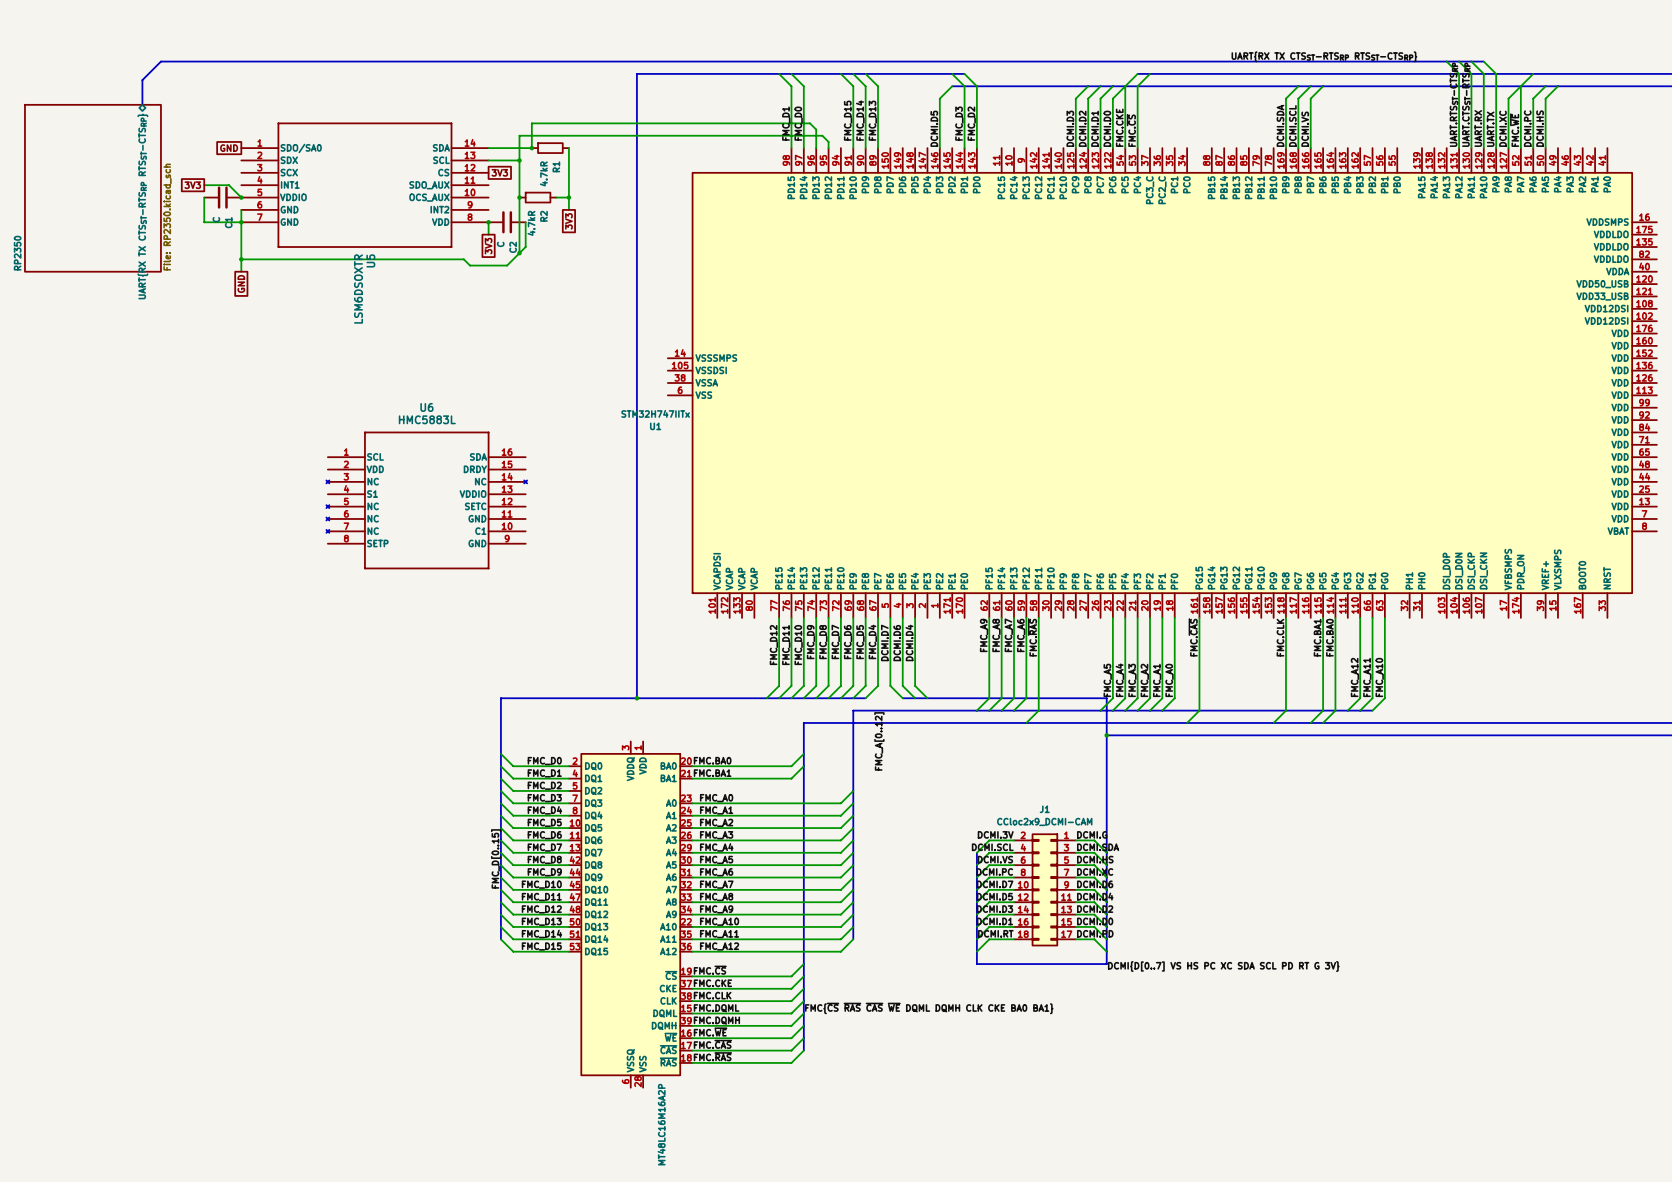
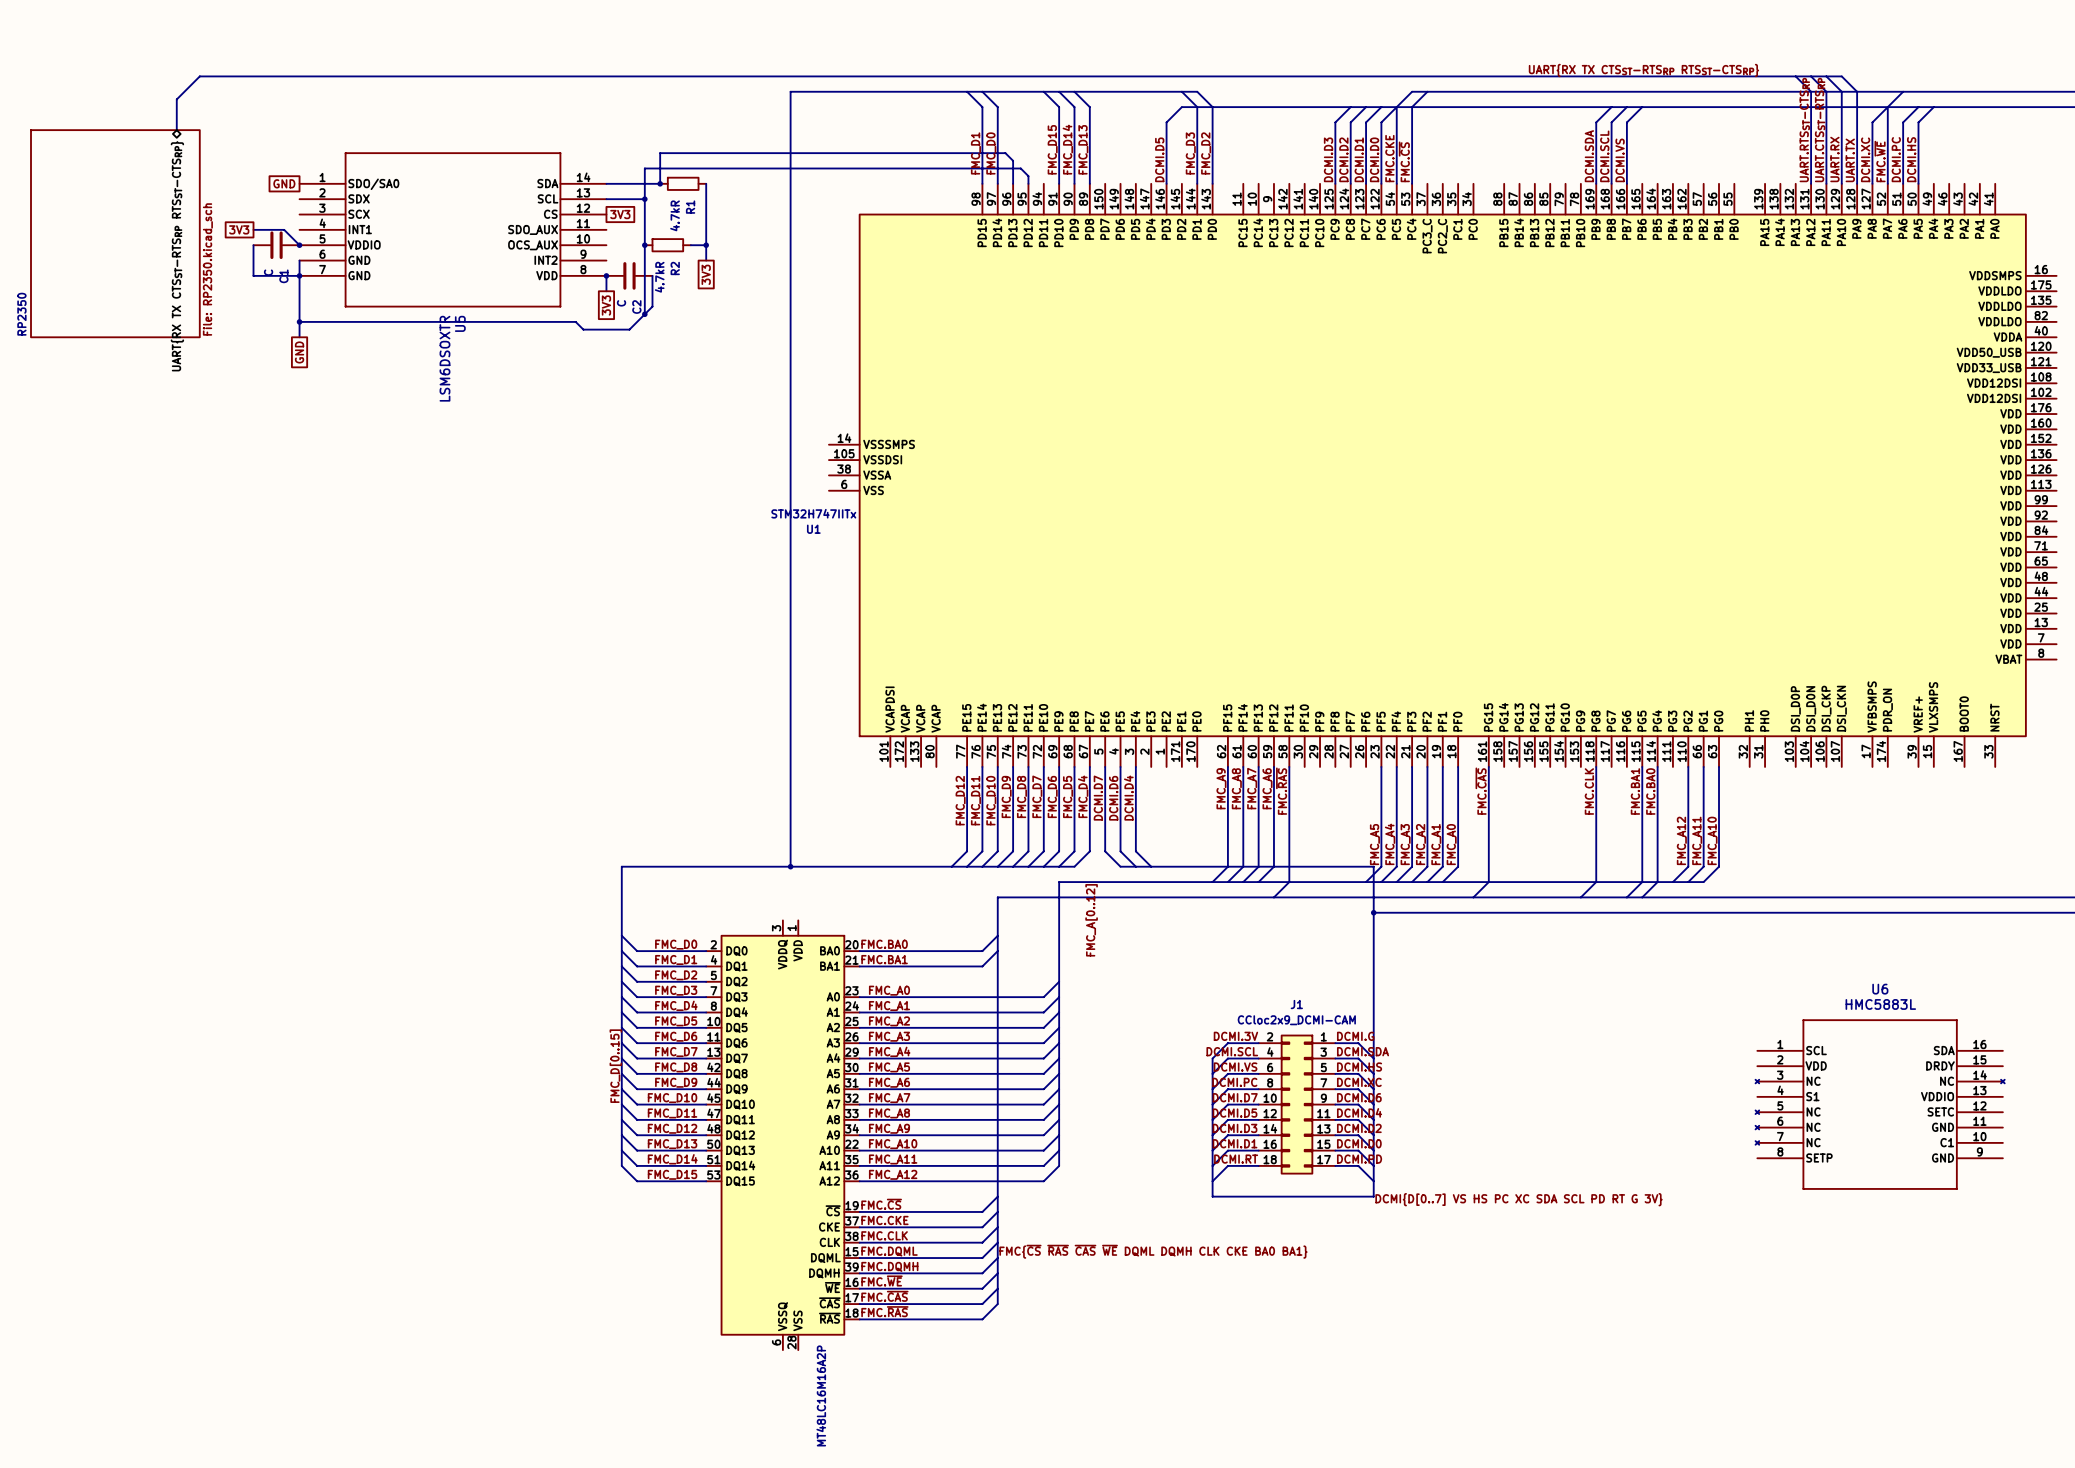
U6 position: (426, 500) -> (1880, 1104)

